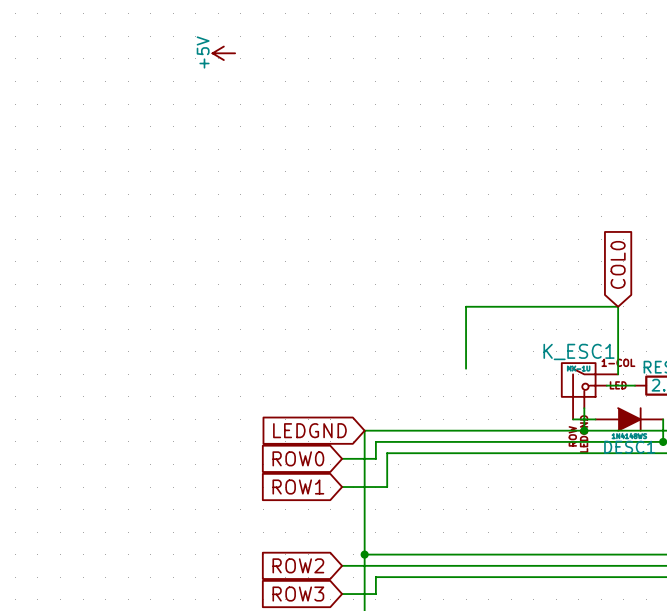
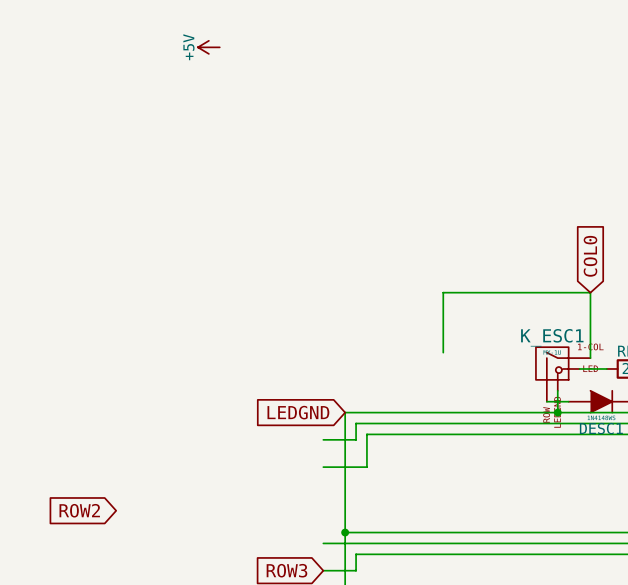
global label: ROW0 (298, 458) -> none
global label: ROW1 (298, 487) -> none
global label position: ROW2 (298, 565) -> ROW2 (79, 510)

